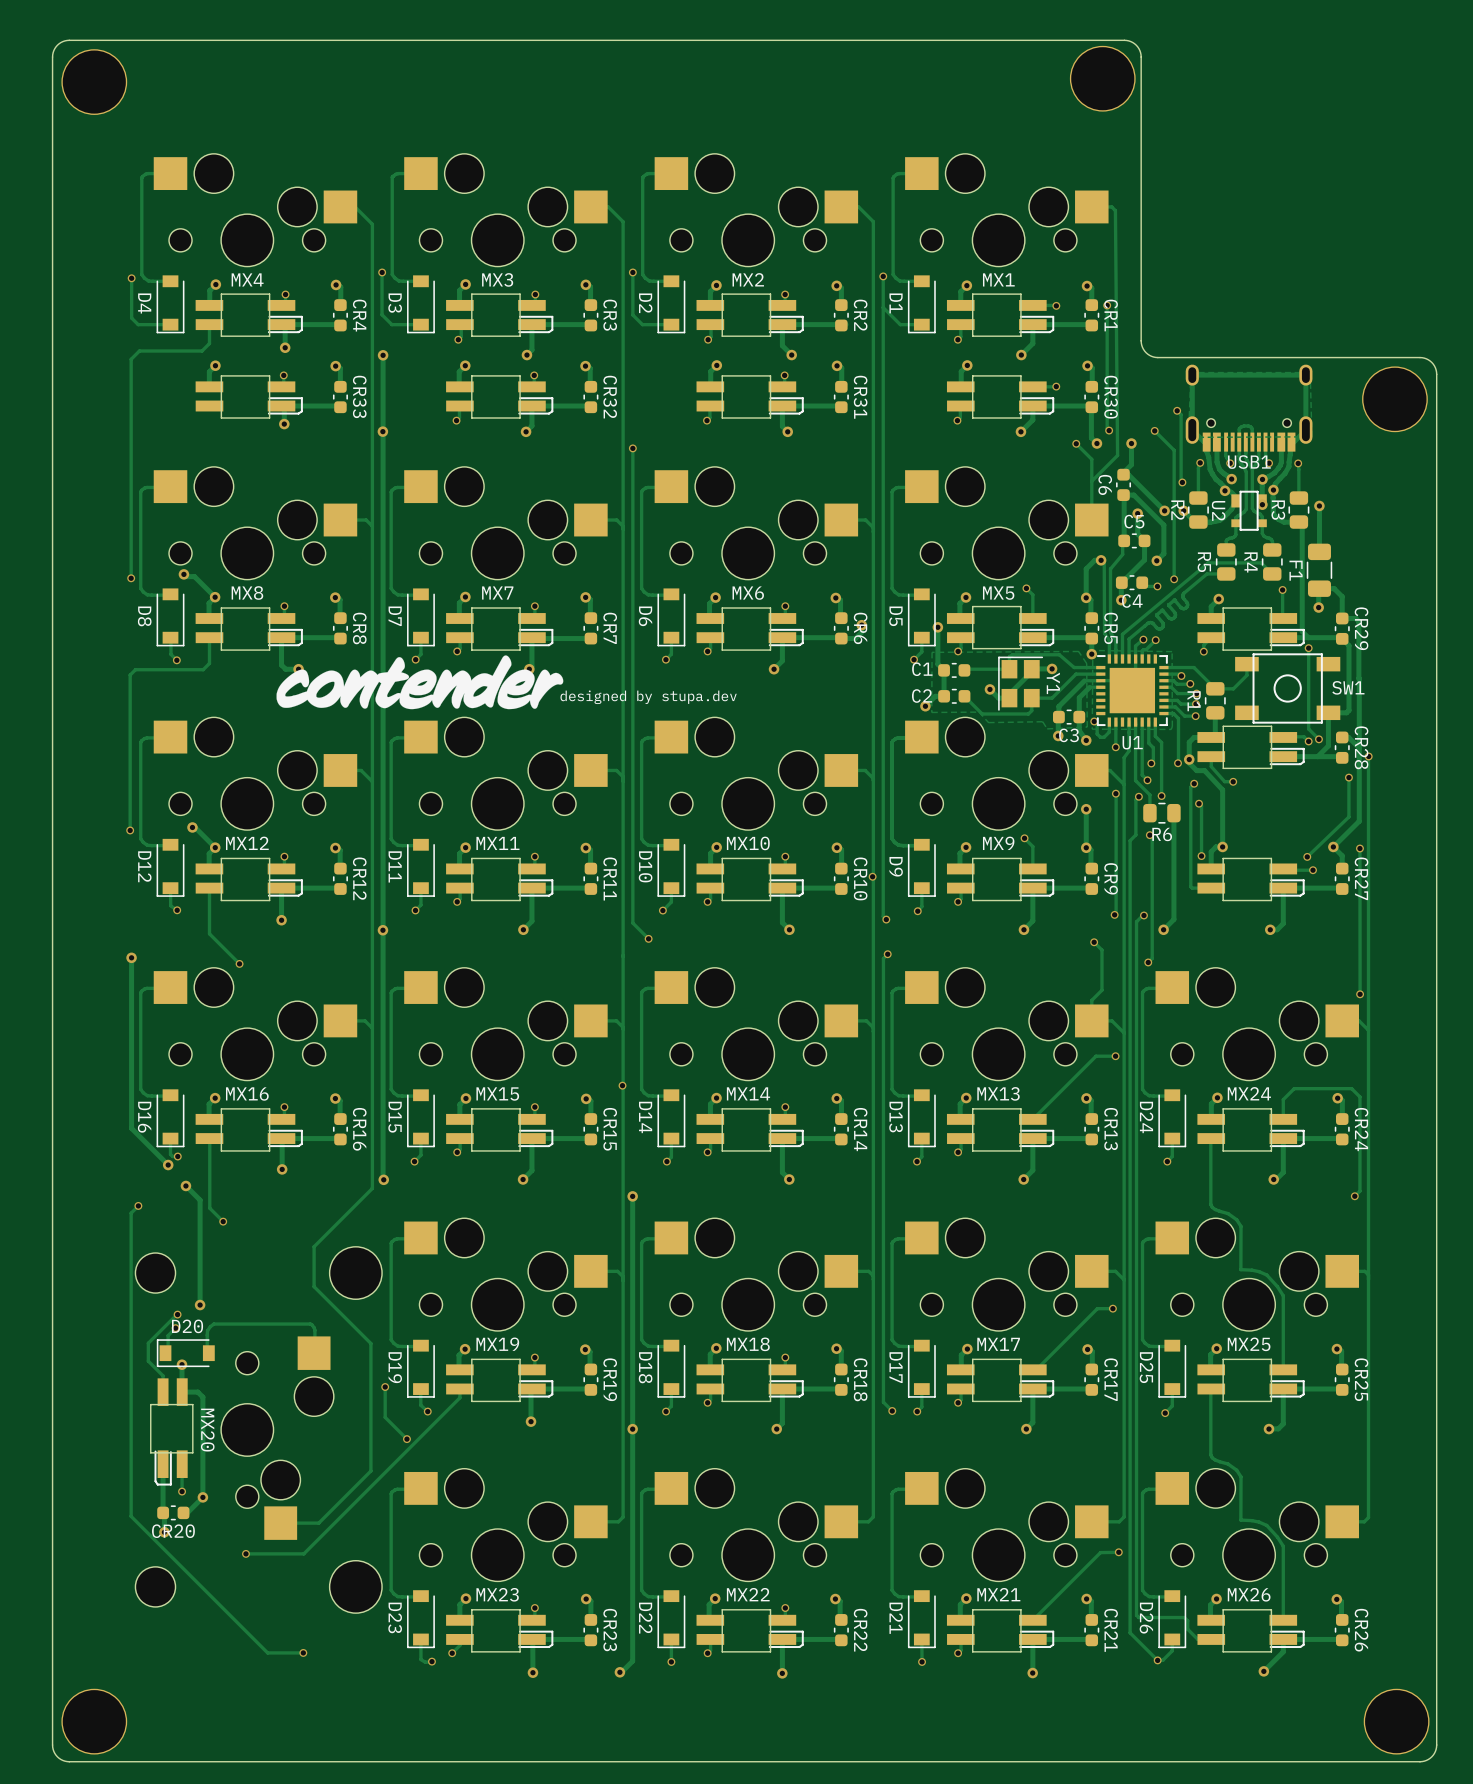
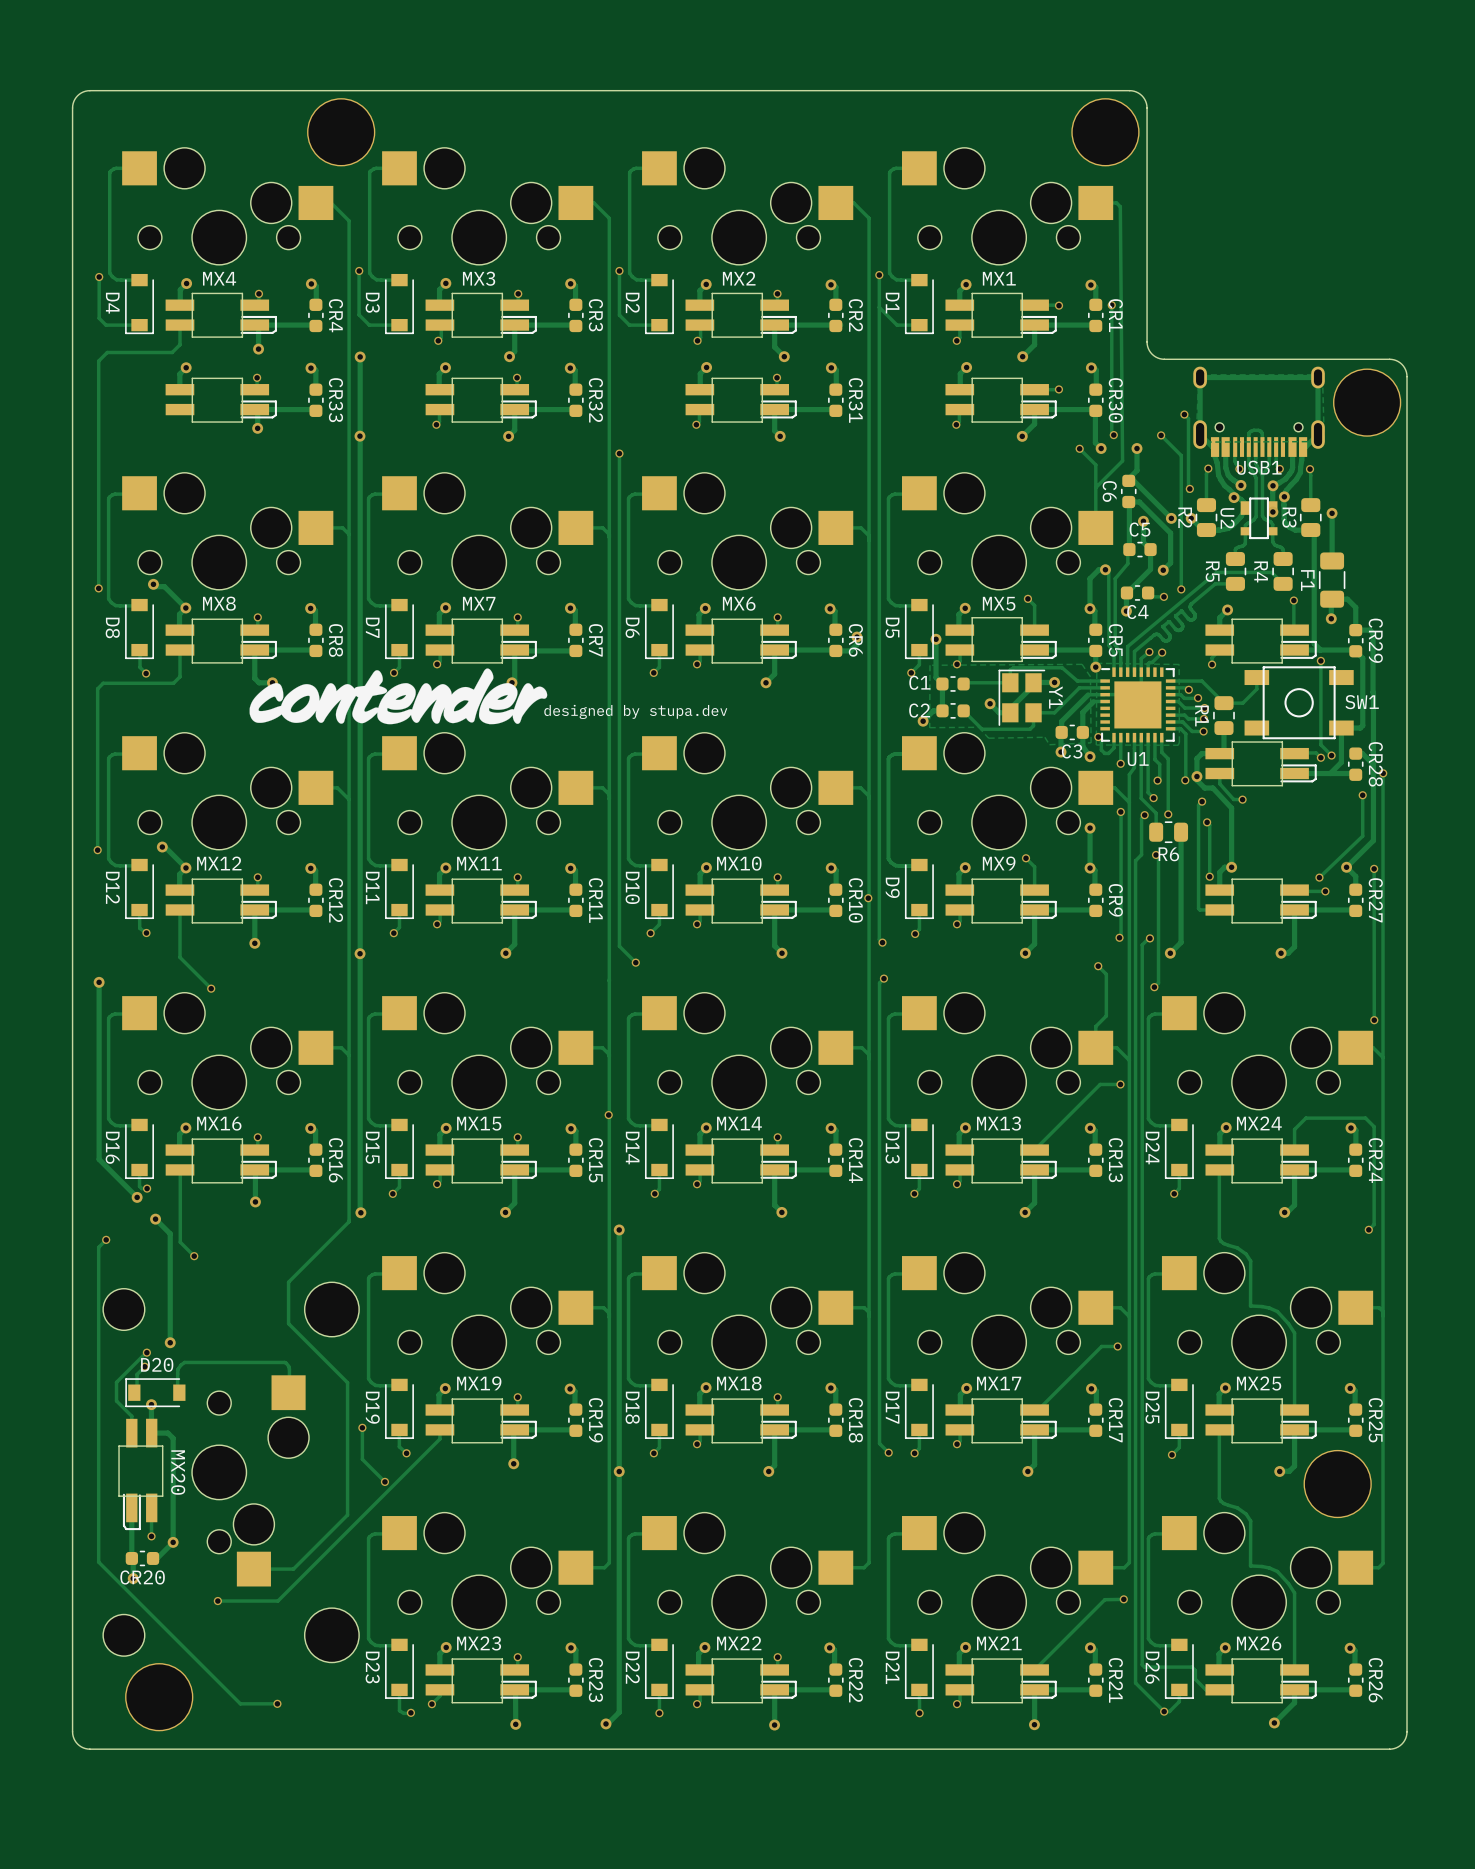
board edge: (1141, 57) (1136, 45) (1124, 40) (69, 40) (60, 42) (54, 48) (52, 57) (52, 1745) (57, 1756) (69, 1761) (1419, 1761) (1431, 1756) (1436, 1745) (1436, 374) (1433, 364) (1424, 358) (1374, 357) -> (1147, 108) (1141, 95) (1129, 90) (89, 90) (81, 92) (74, 99) (72, 108) (72, 1731) (77, 1744) (89, 1749) (1389, 1749) (1401, 1744) (1406, 1731) (1406, 376) (1401, 364) (1389, 359)
board edge: (1141, 57) (1141, 115) -> none
part position: (1102, 78) -> (1105, 132)
part position: (94, 82) -> (341, 132)
part position: (1394, 399) -> (1367, 402)
part position: (94, 1721) -> (159, 1697)
part position: (1396, 1721) -> (1337, 1484)

